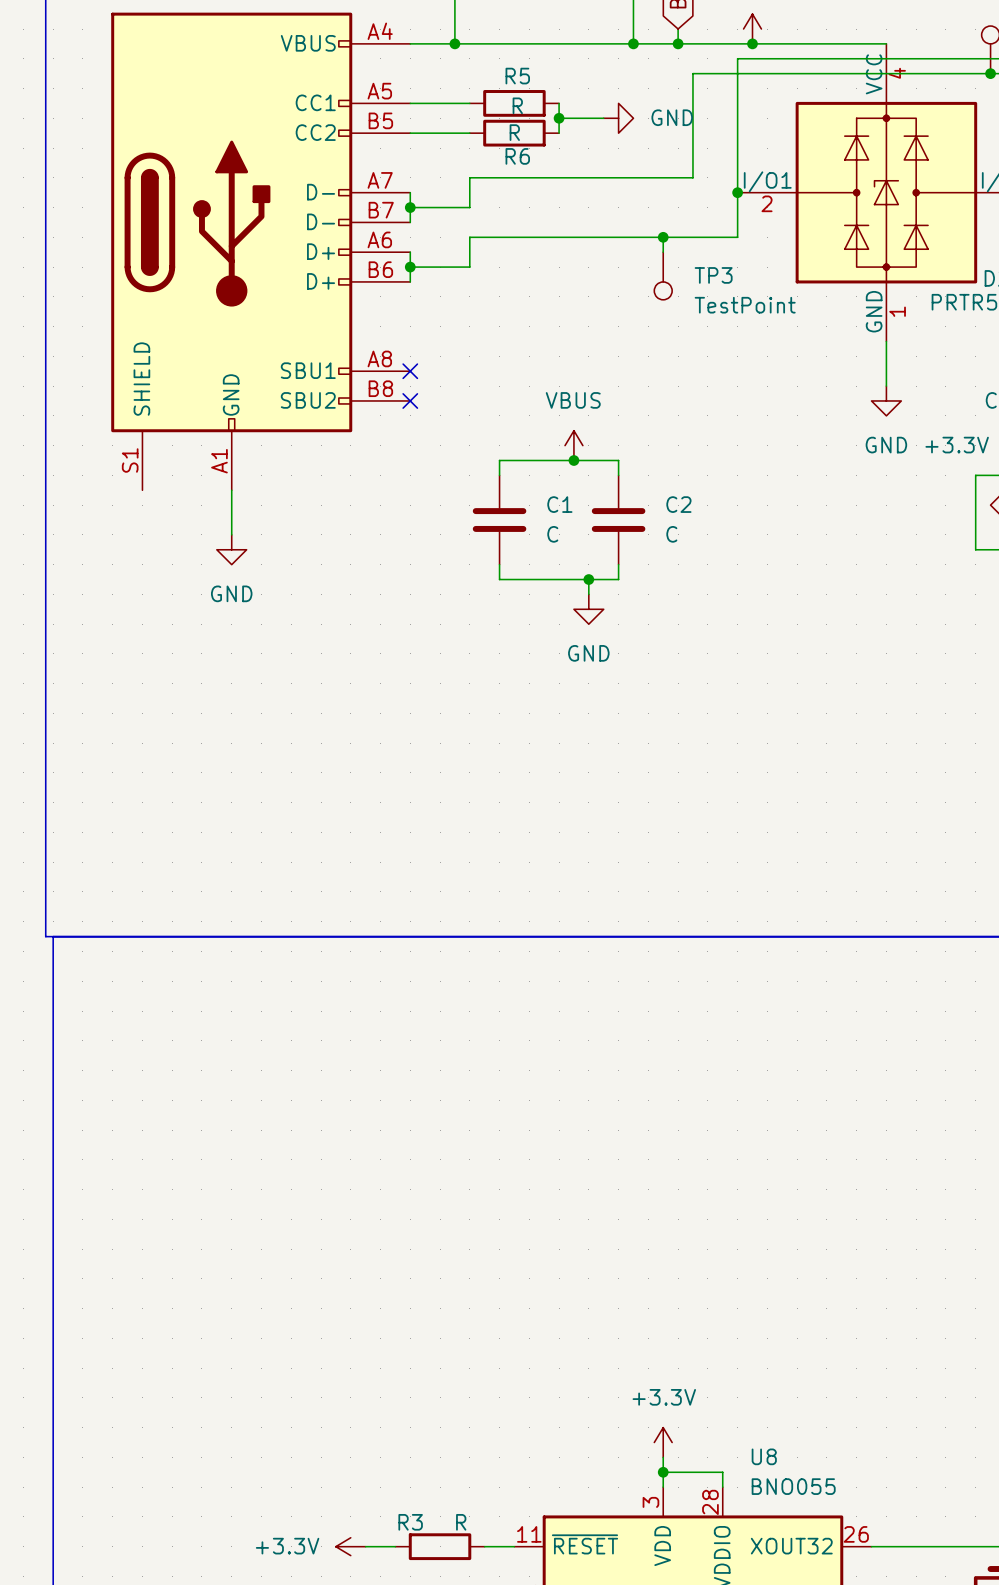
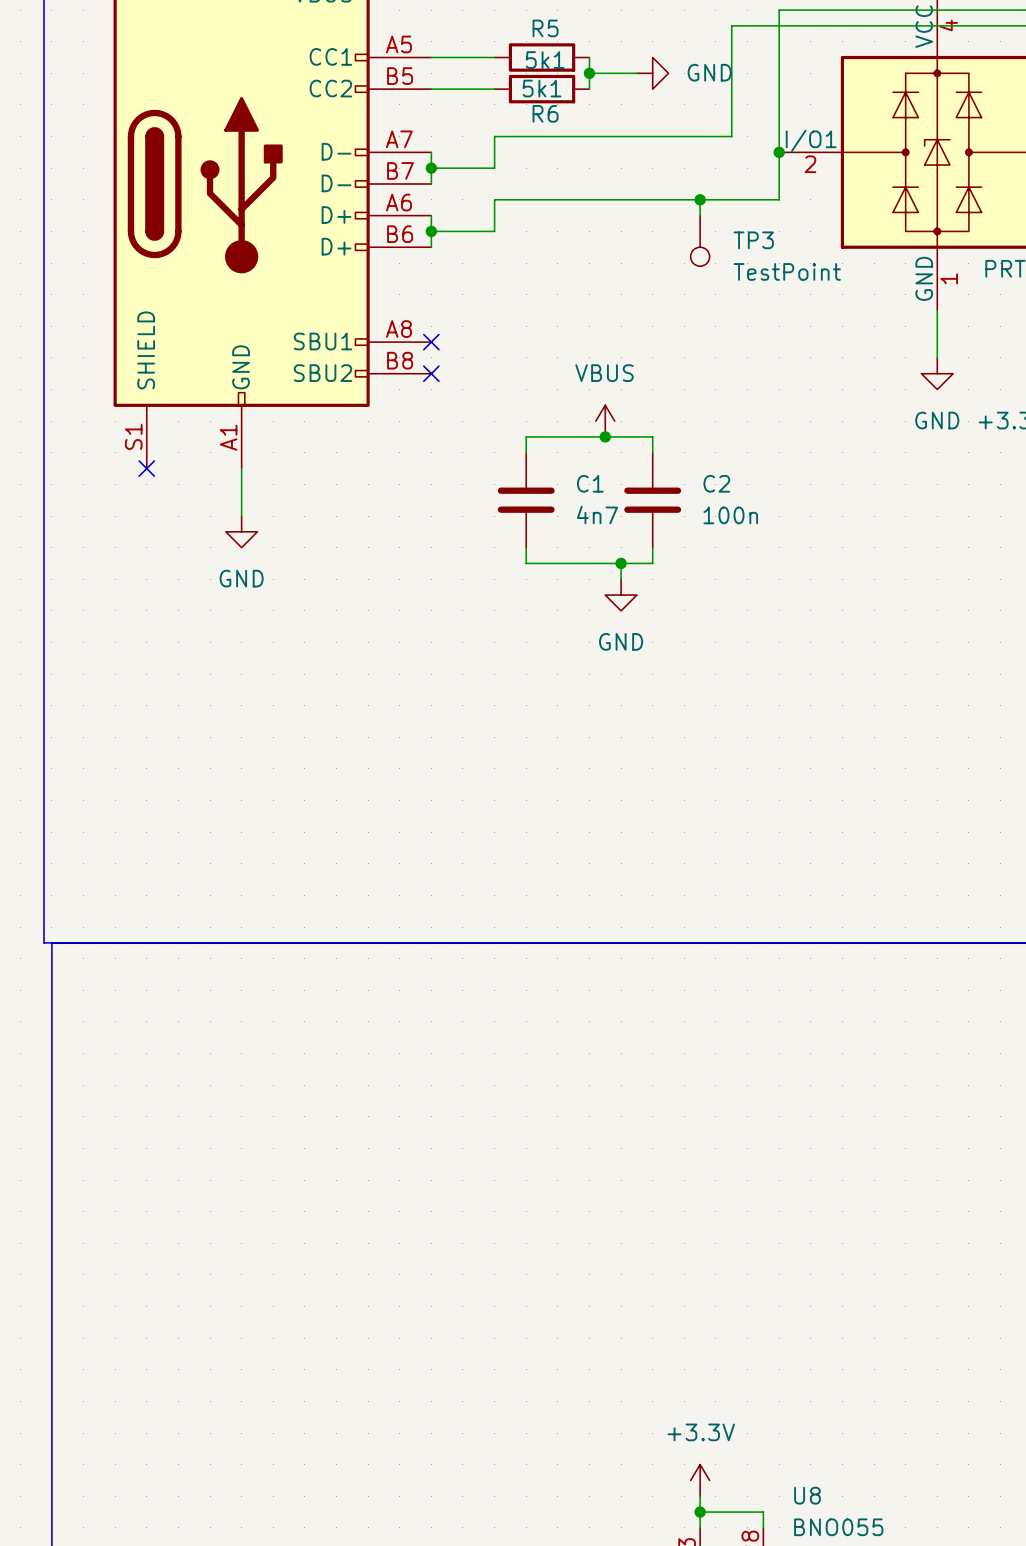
R5 value: R (517, 105) -> 5k1 (545, 60)
R6 value: R (514, 132) -> 5k1 (542, 88)
no-connect mark: none -> (146, 468)
C1 value: C (552, 534) -> 4n7 (597, 515)
C2 value: C (671, 534) -> 100n (730, 515)

